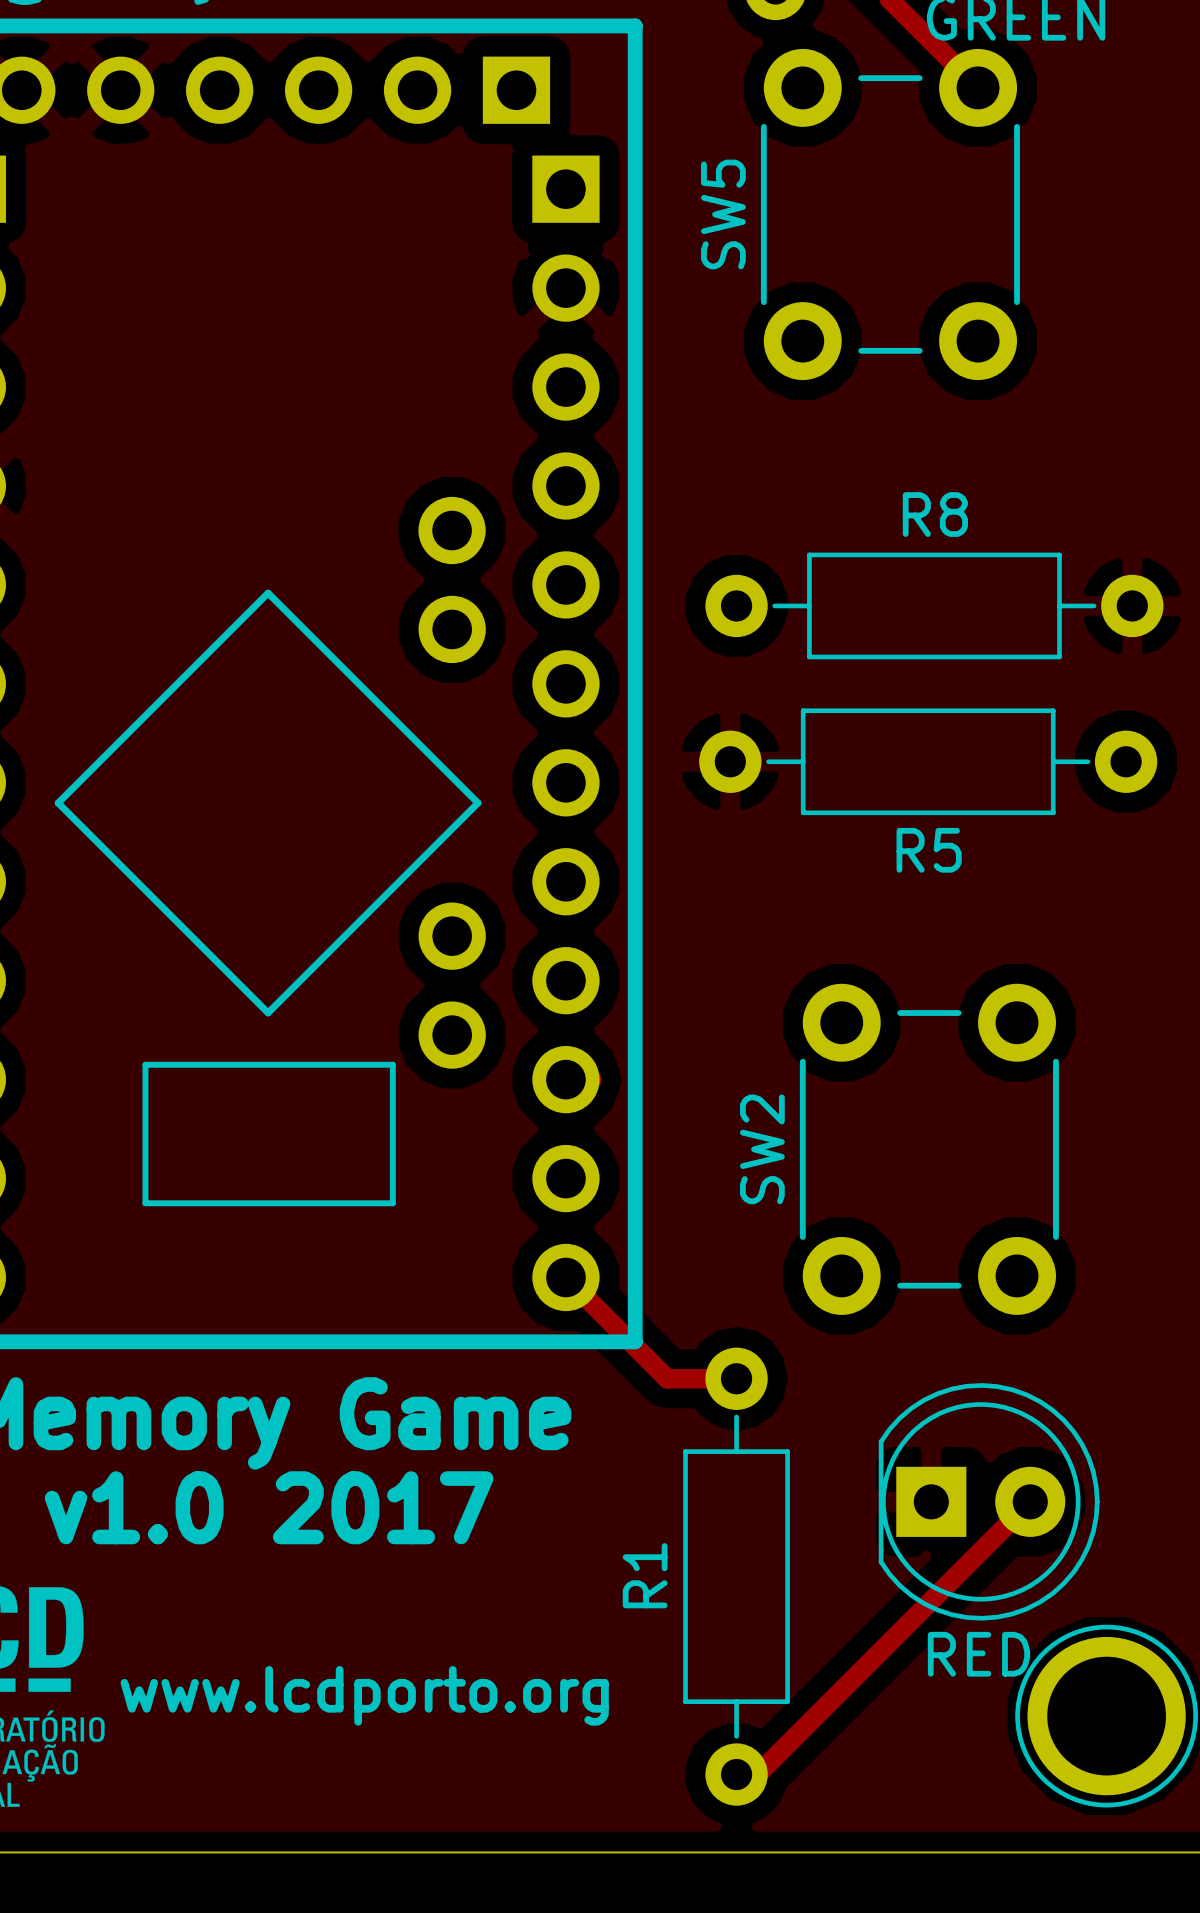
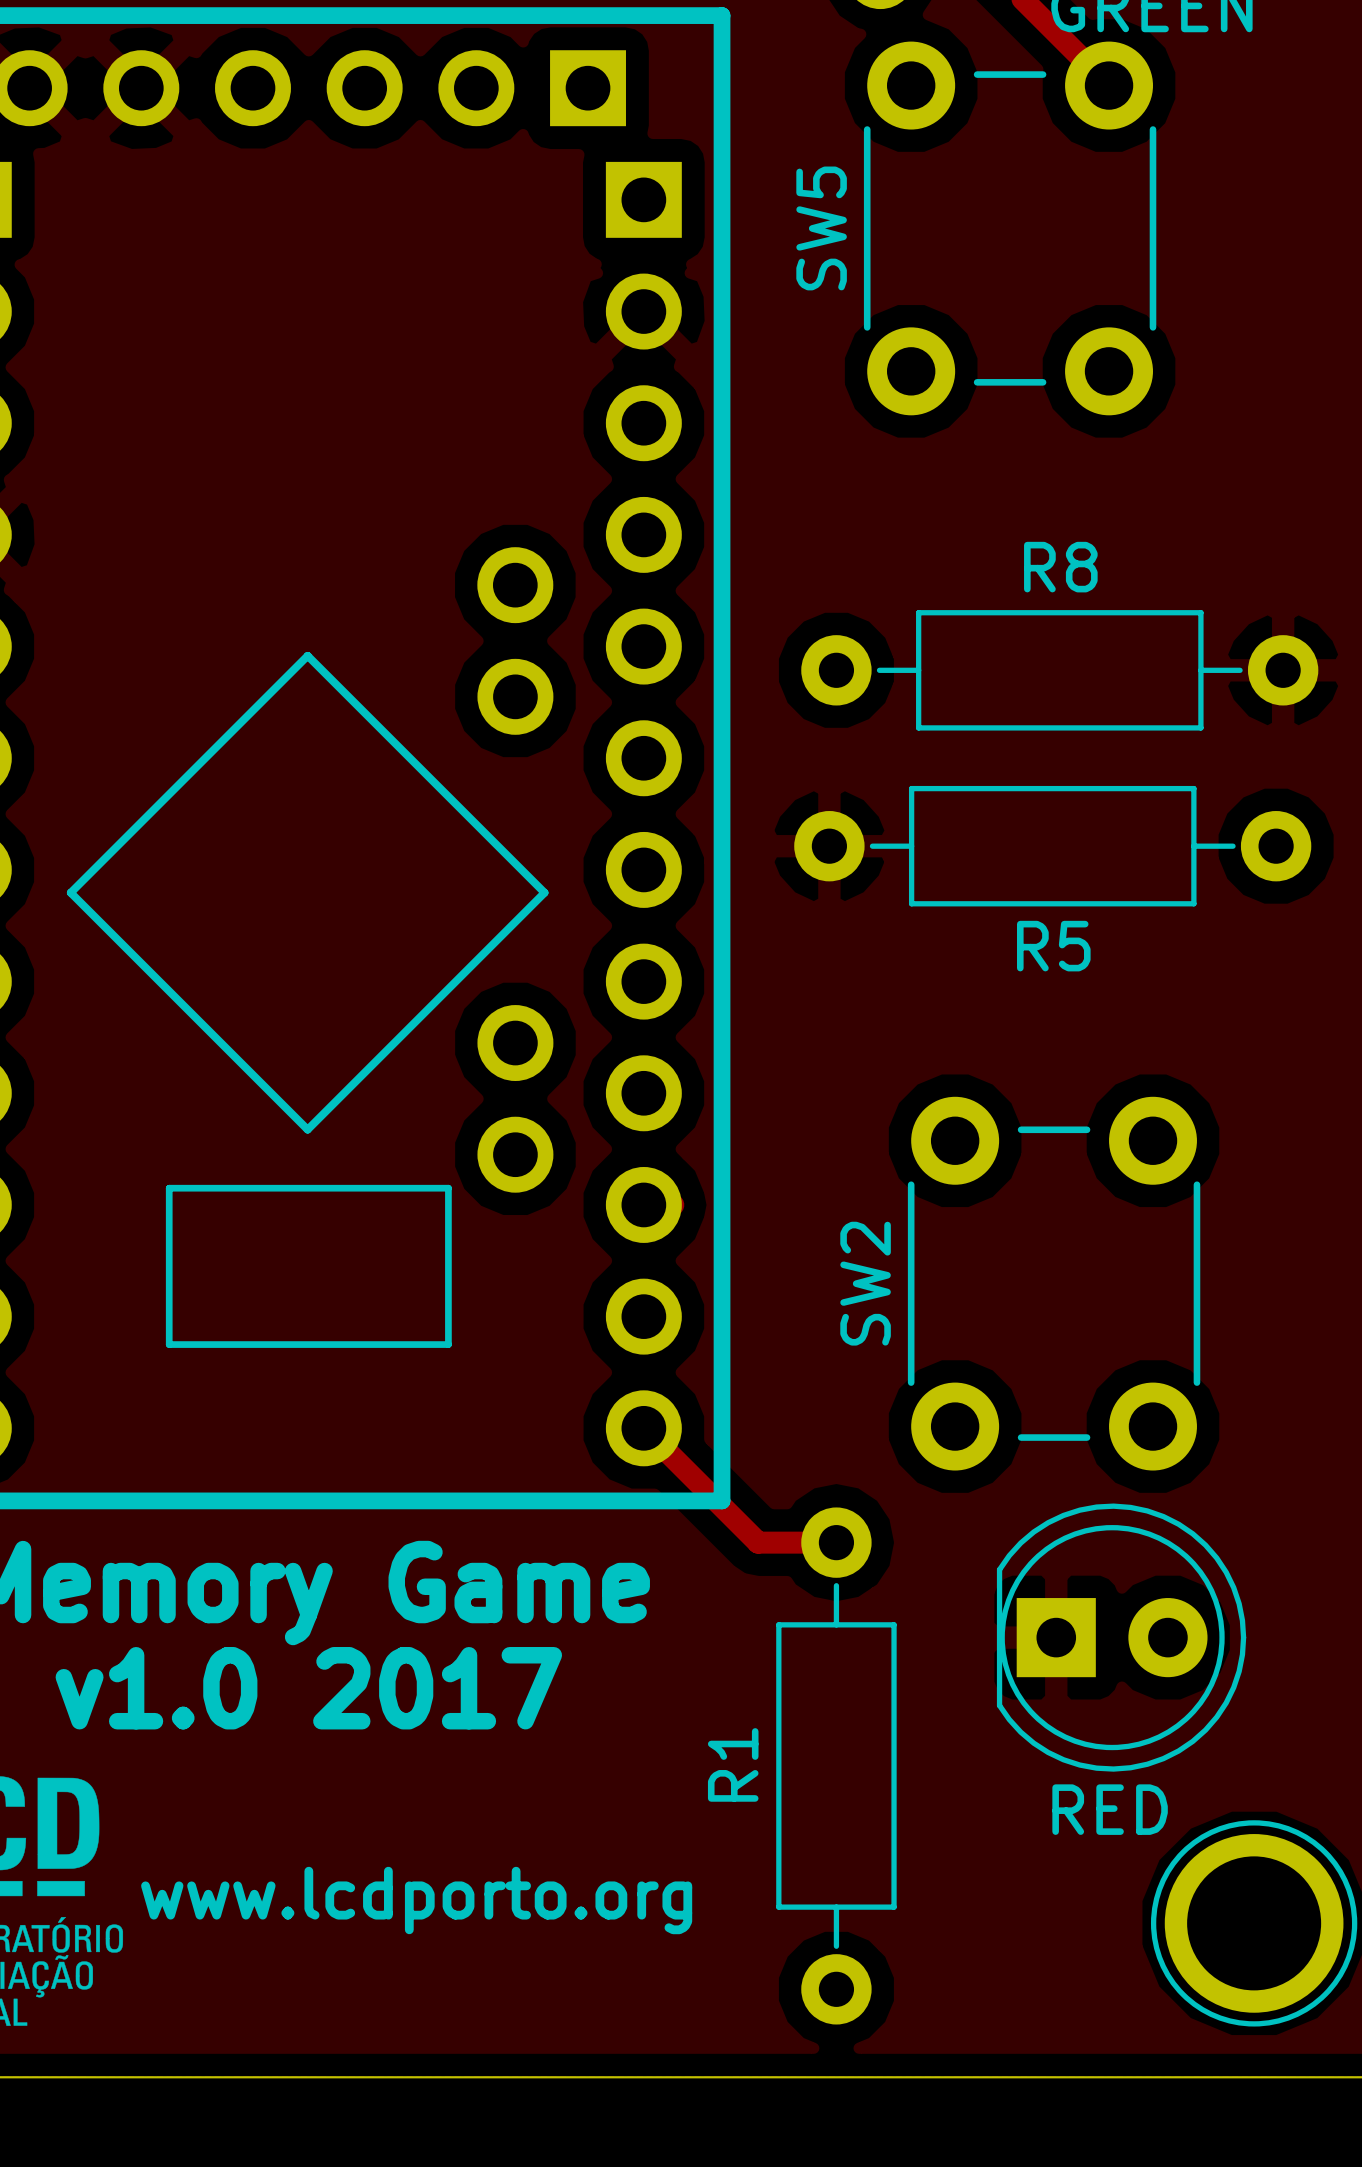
RED position: (989, 1501) -> (1121, 1637)
track: (1030, 1501) (757, 1774) (736, 1774) -> none

